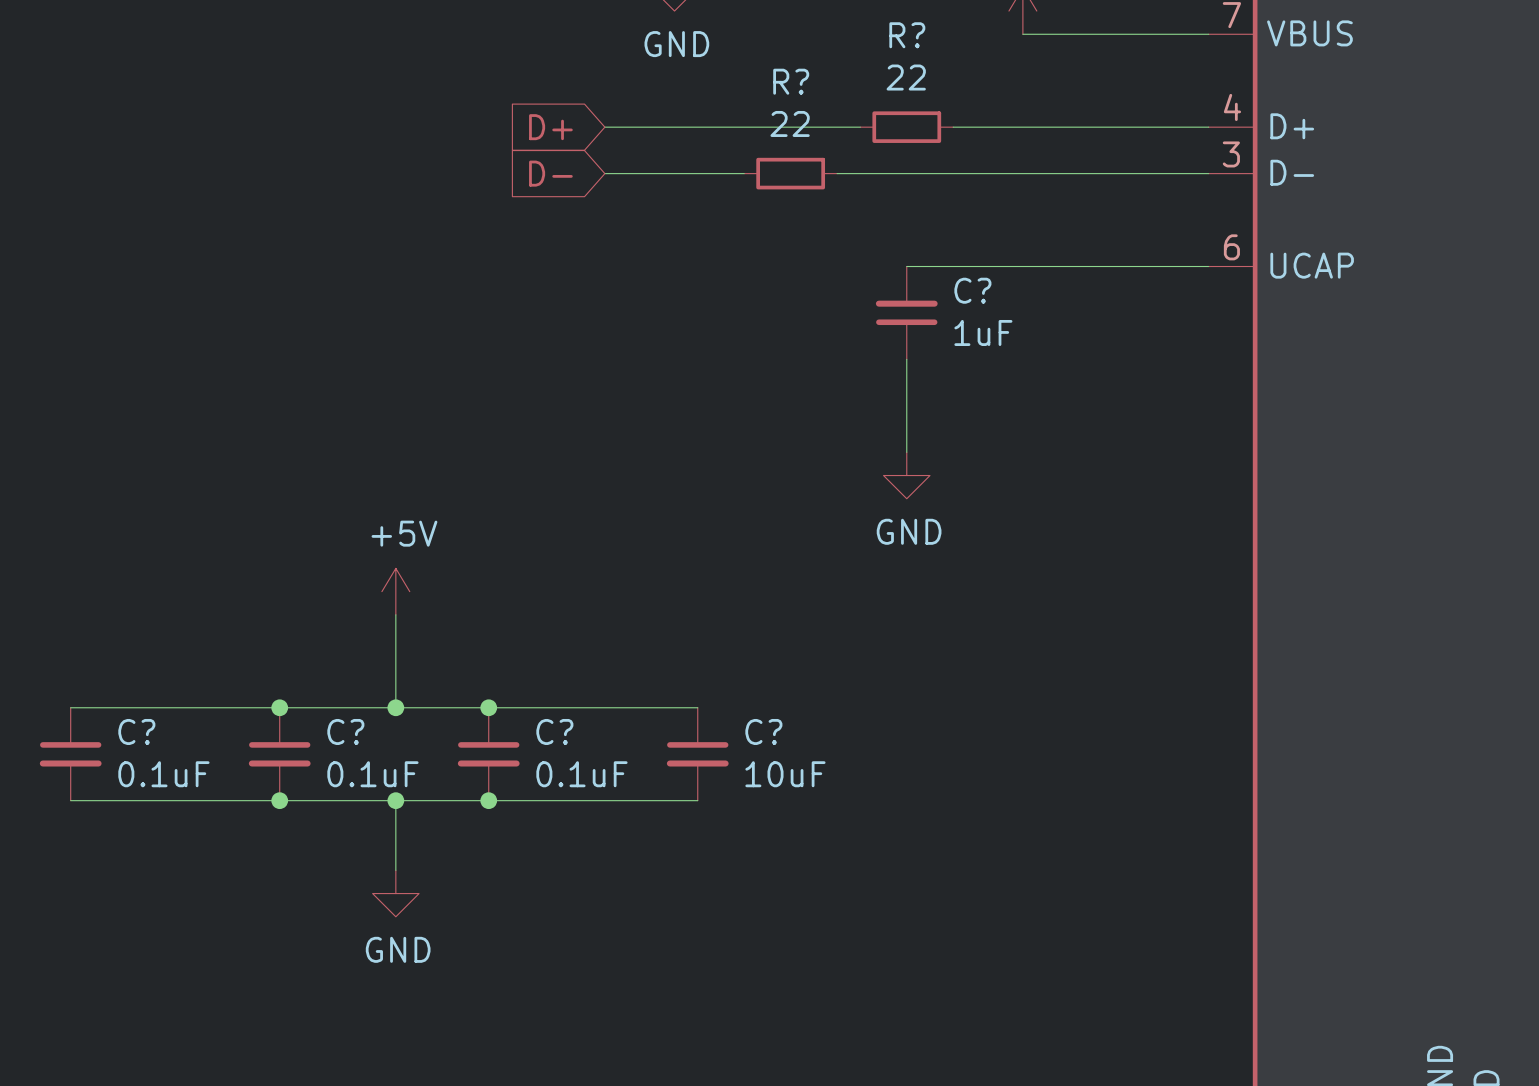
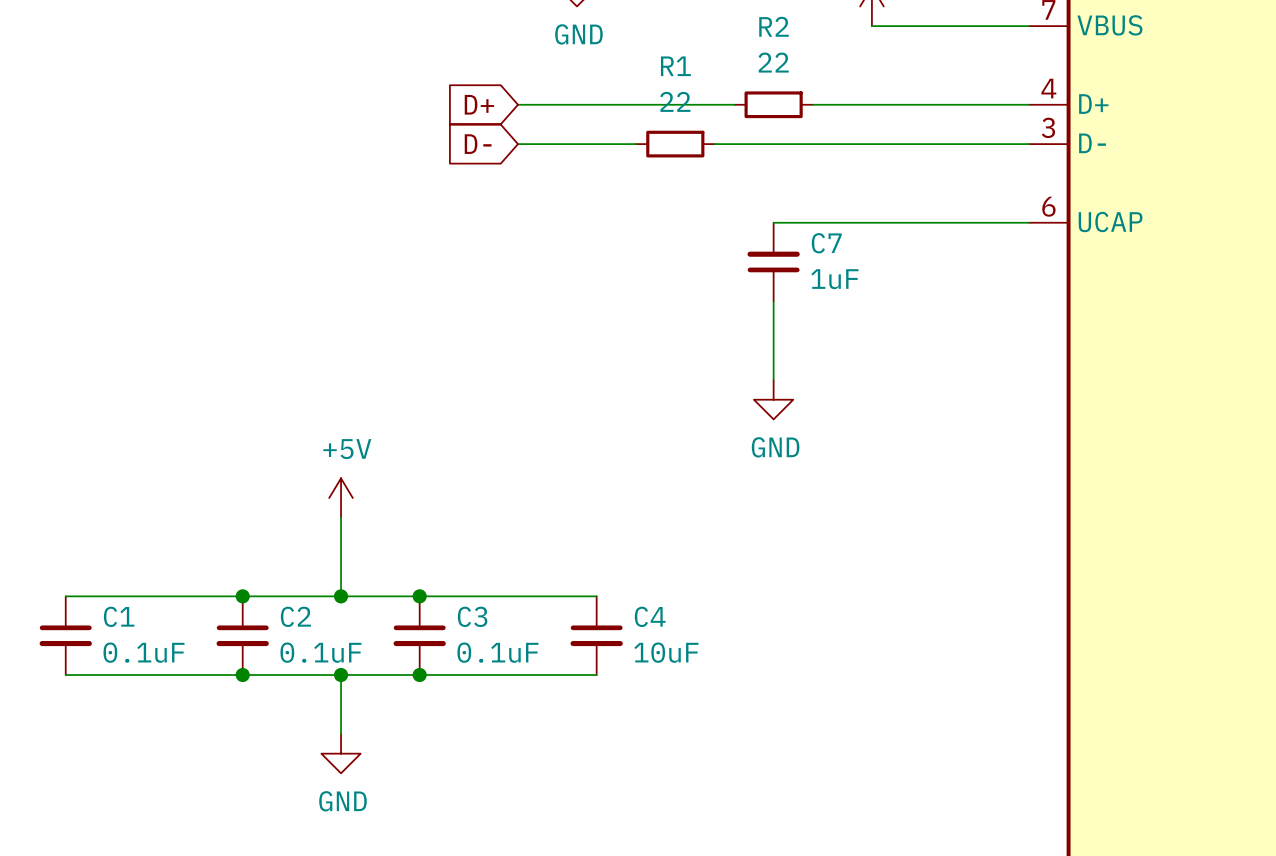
R? name: R? (907, 35) -> R2 (774, 26)
R? name: R? (791, 81) -> R1 (675, 66)
C? name: C? (972, 290) -> C7 (826, 243)
C? name: C? (136, 731) -> C1 (119, 616)
C? name: C? (345, 731) -> C2 (295, 616)
C? name: C? (554, 731) -> C3 (472, 616)
C? name: C? (763, 731) -> C4 (650, 616)

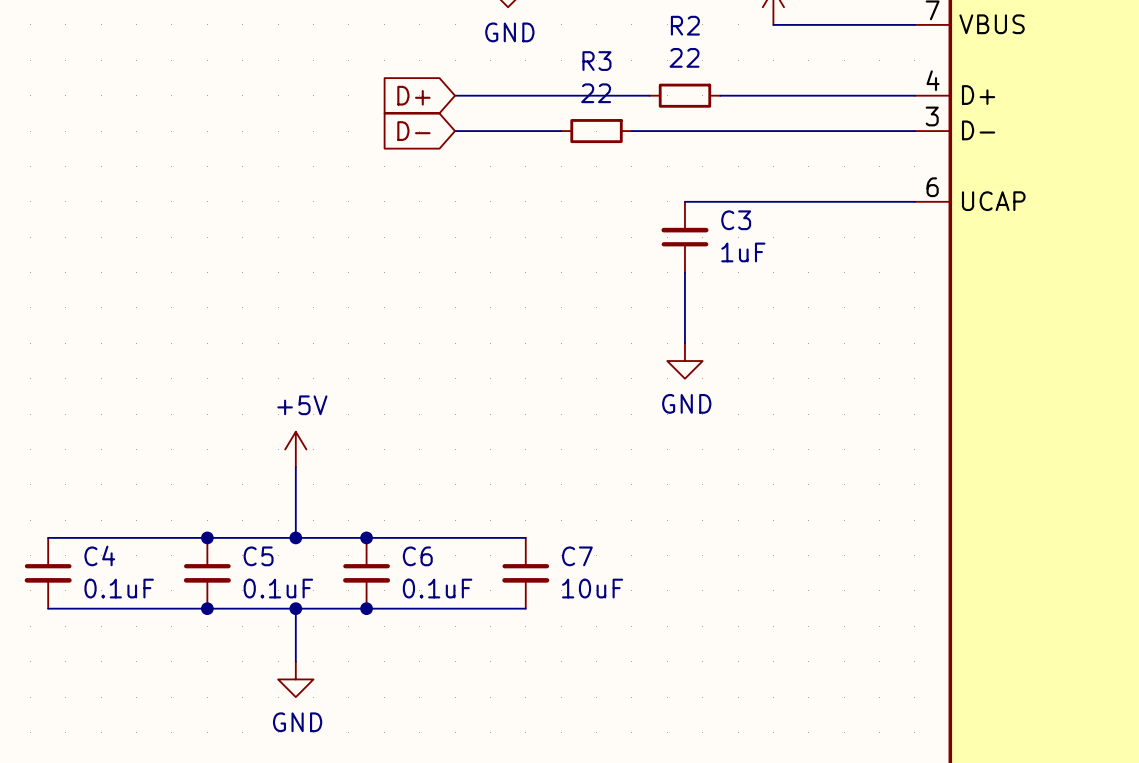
R1 name: R1 (675, 66) -> R3 (596, 61)
C7 name: C7 (826, 243) -> C3 (736, 220)
C1 name: C1 (119, 616) -> C4 (99, 555)
C2 name: C2 (295, 616) -> C5 (258, 556)
C3 name: C3 (472, 616) -> C6 (417, 556)
C4 name: C4 (650, 616) -> C7 (577, 556)

